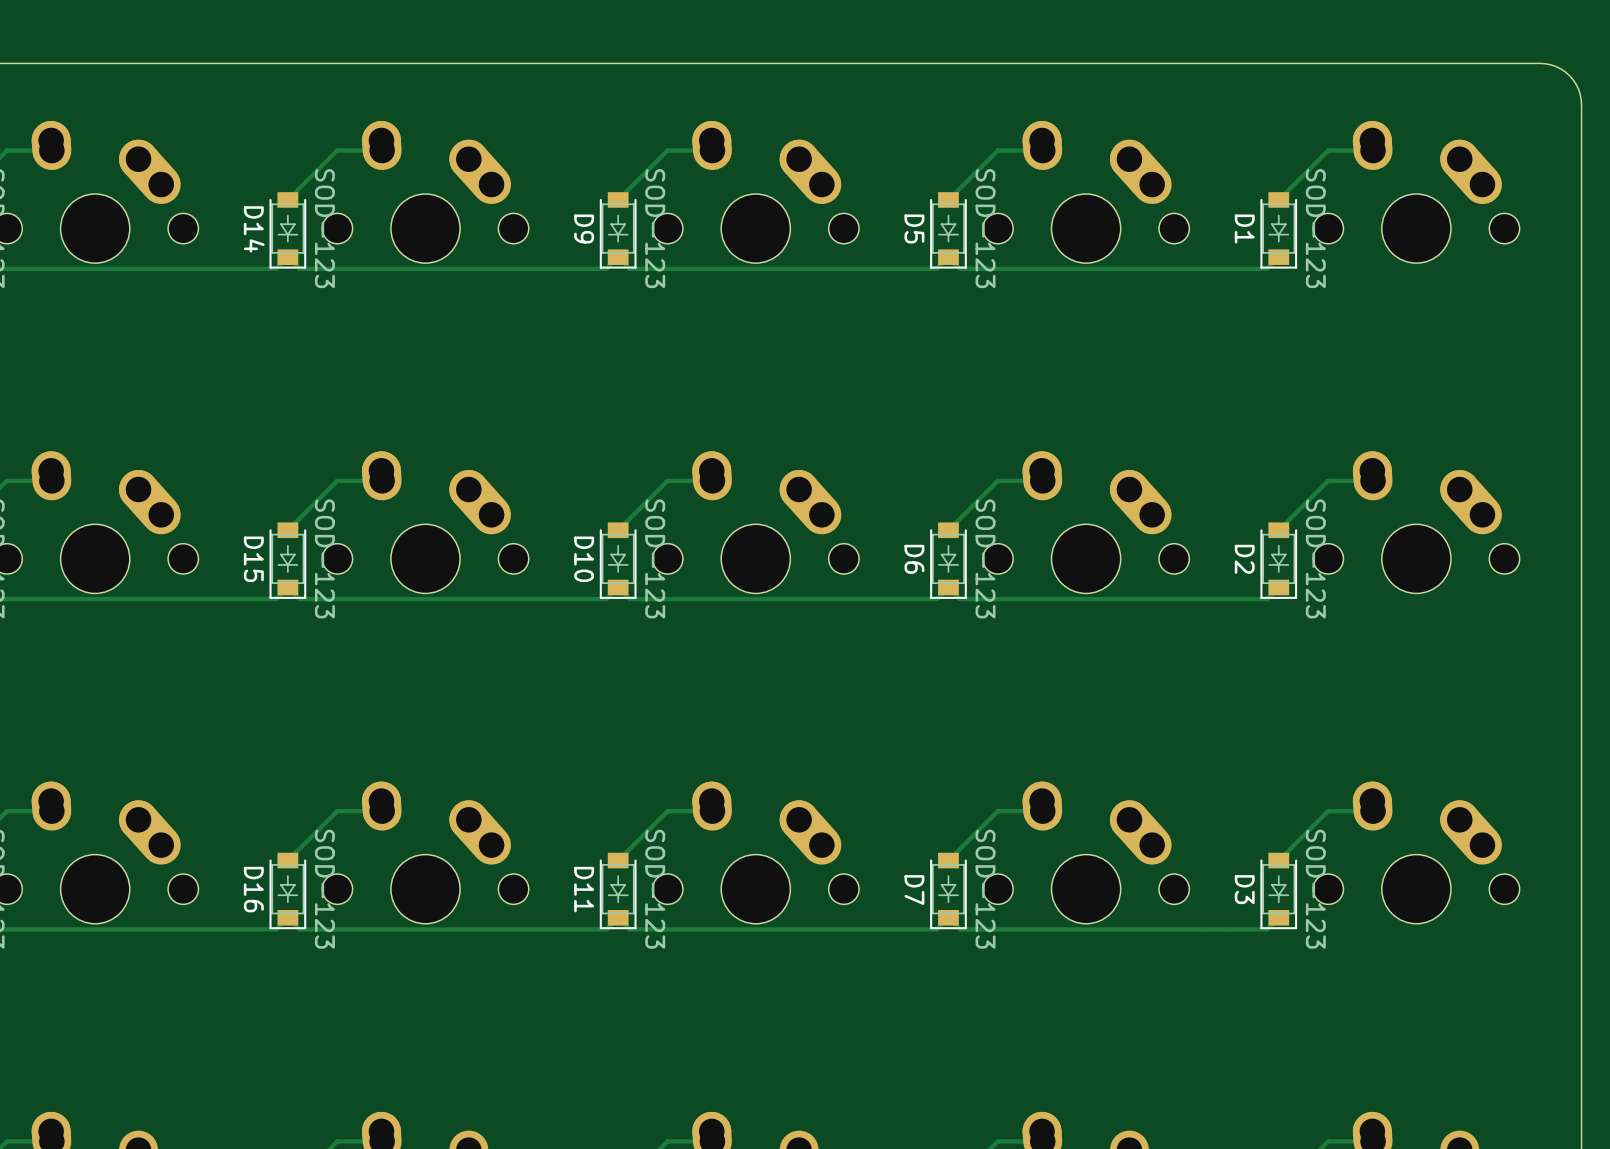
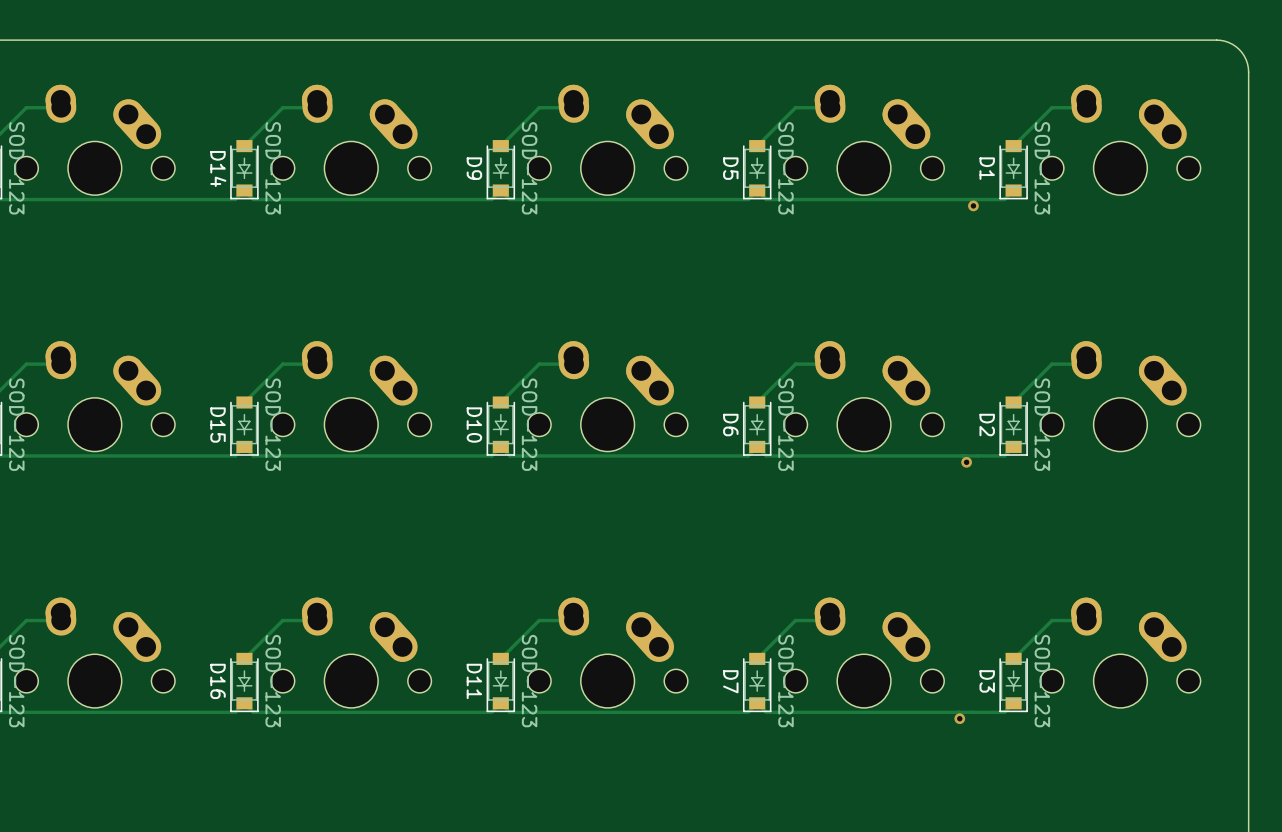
via: none -> (973, 205)
via: none -> (966, 462)
via: none -> (959, 718)

